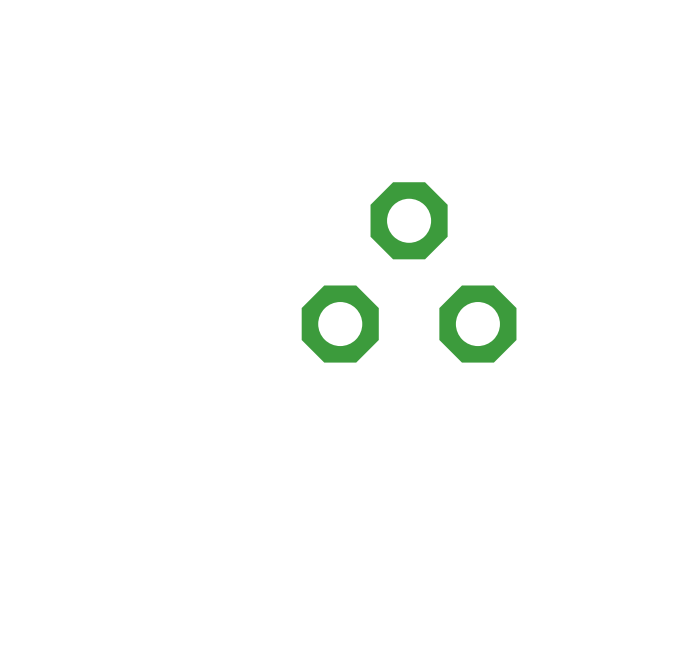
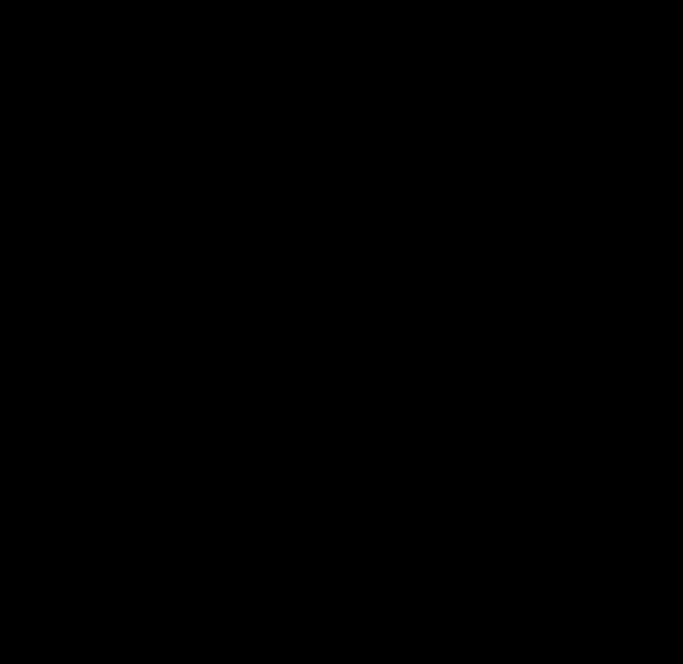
part: (409, 272) -> none

